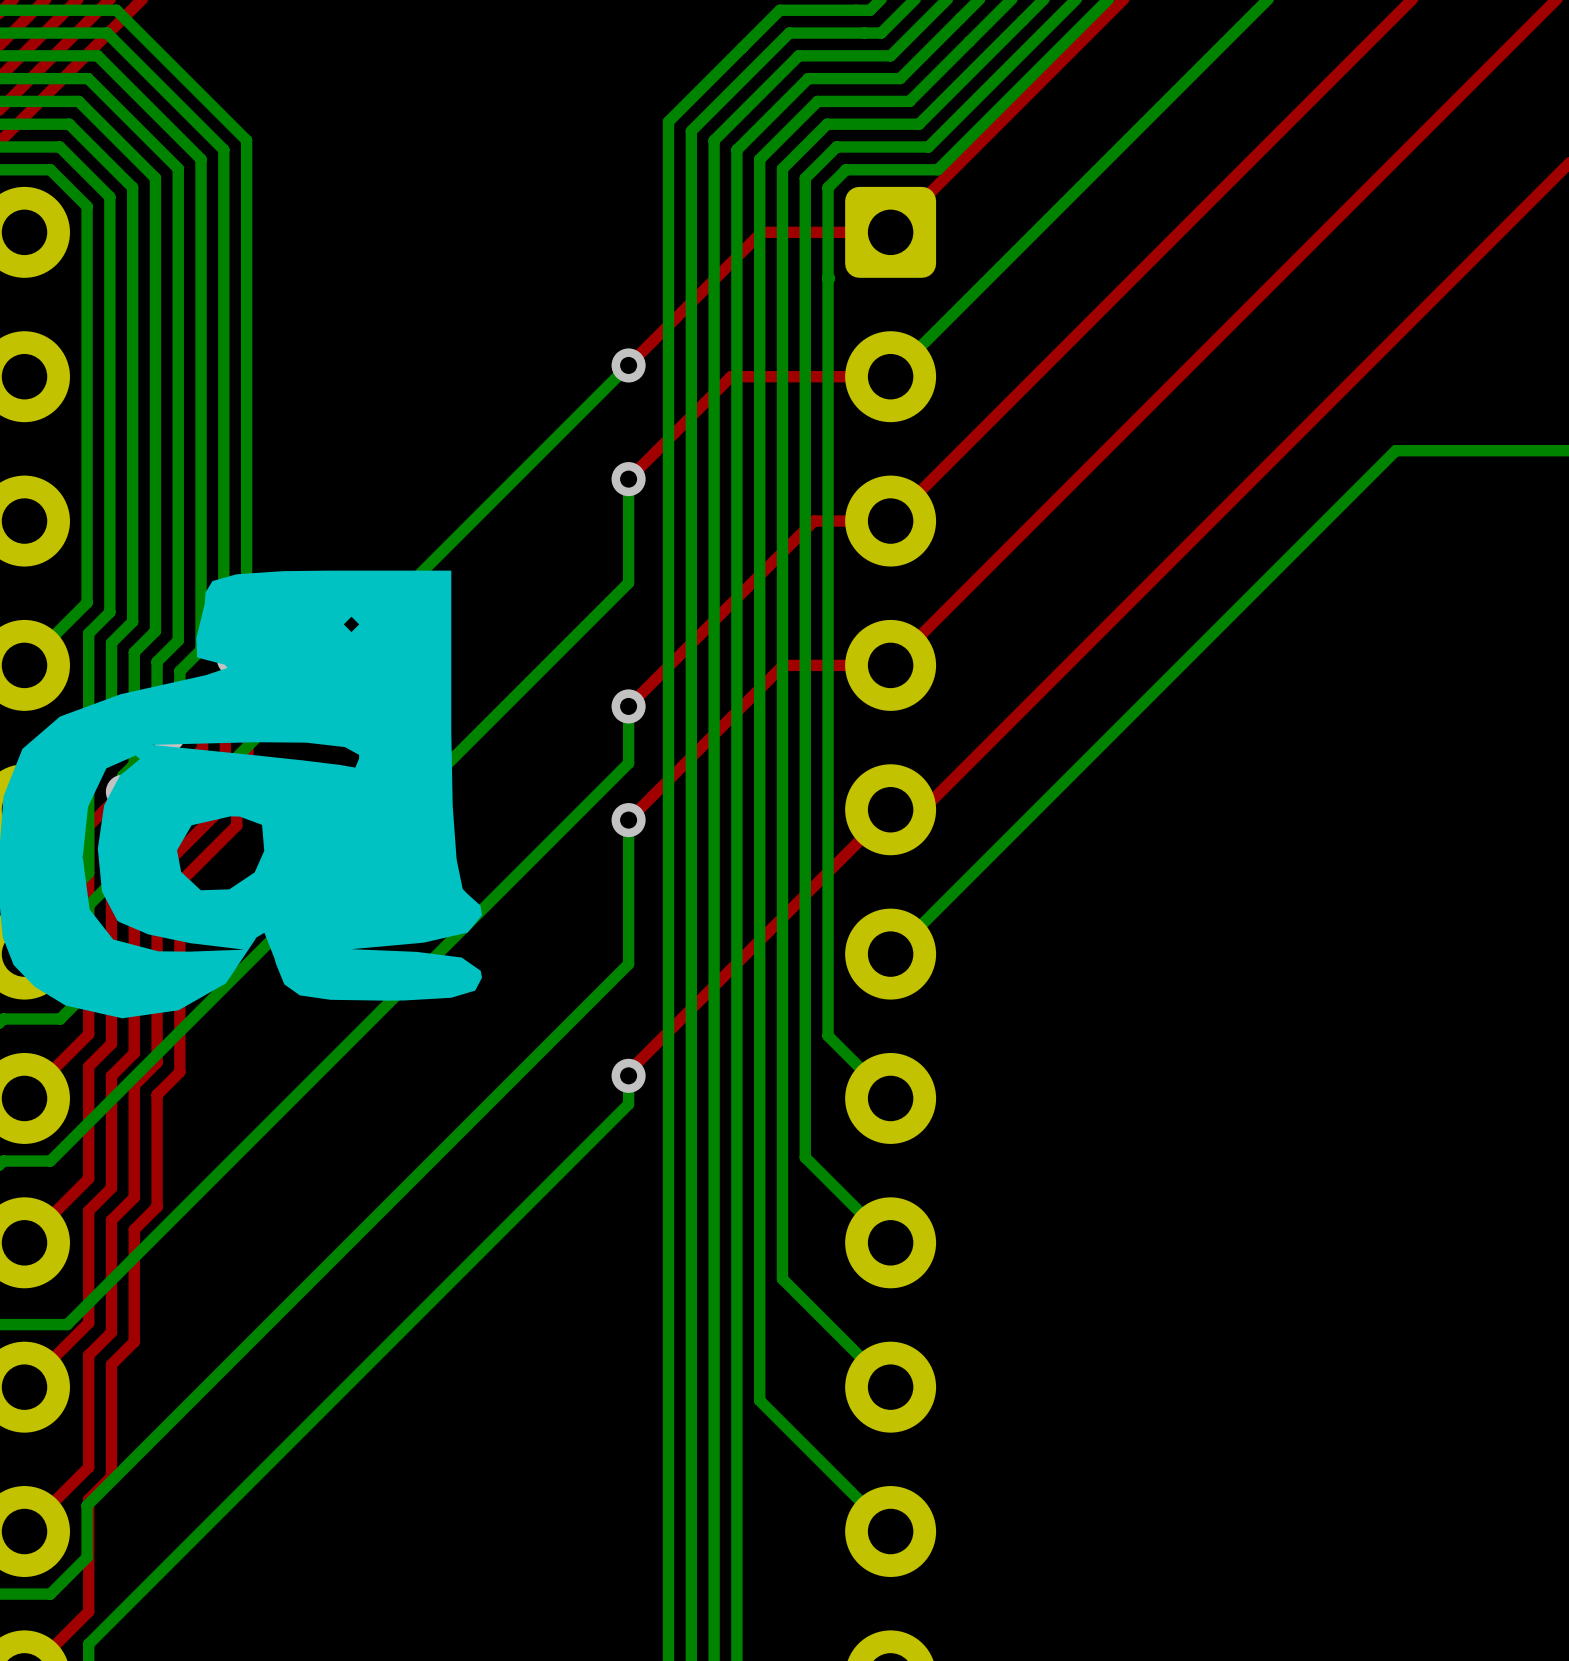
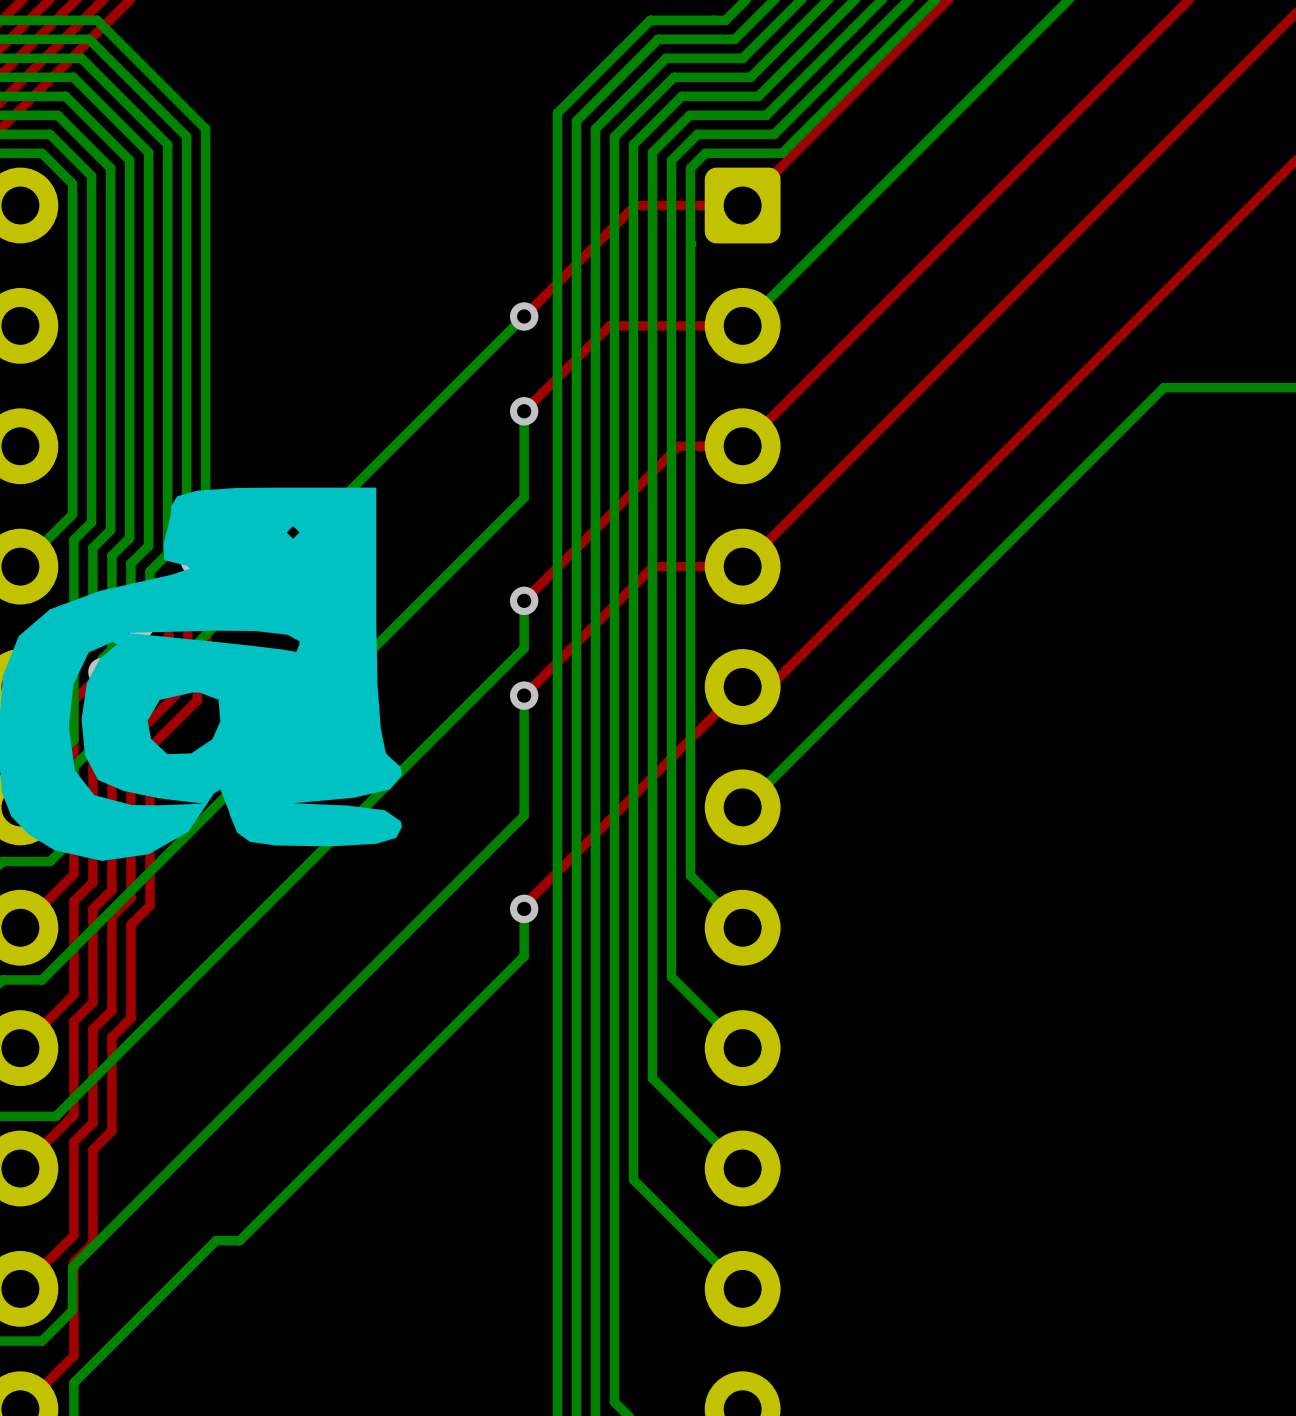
bottom track: (628, 1104) (259, 1473) -> (524, 932) (524, 956) (239, 1240) (216, 1240)

